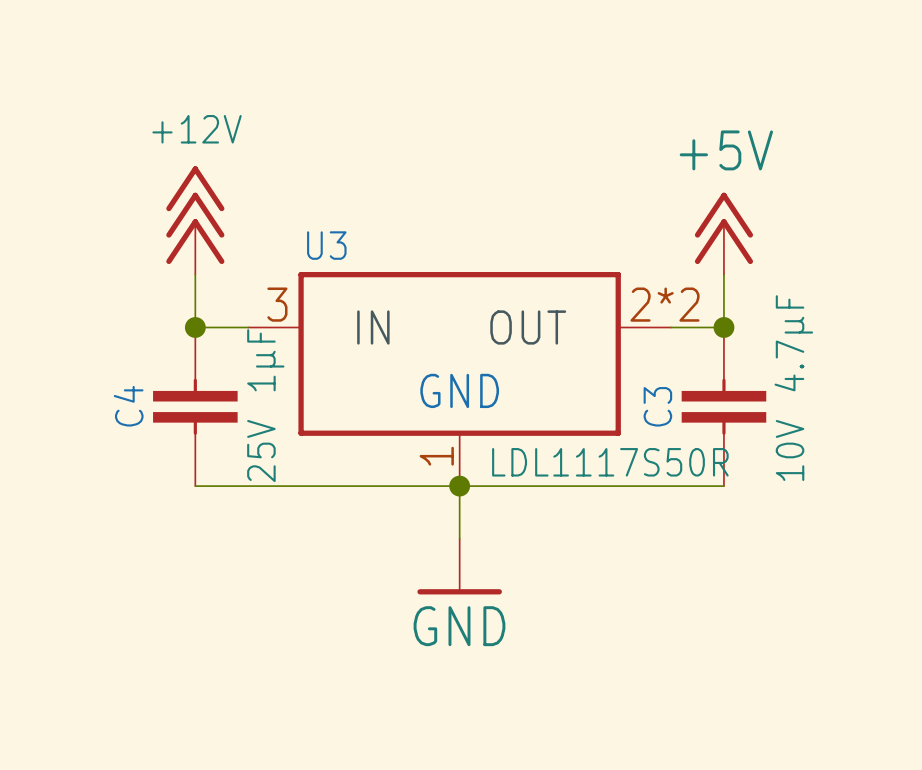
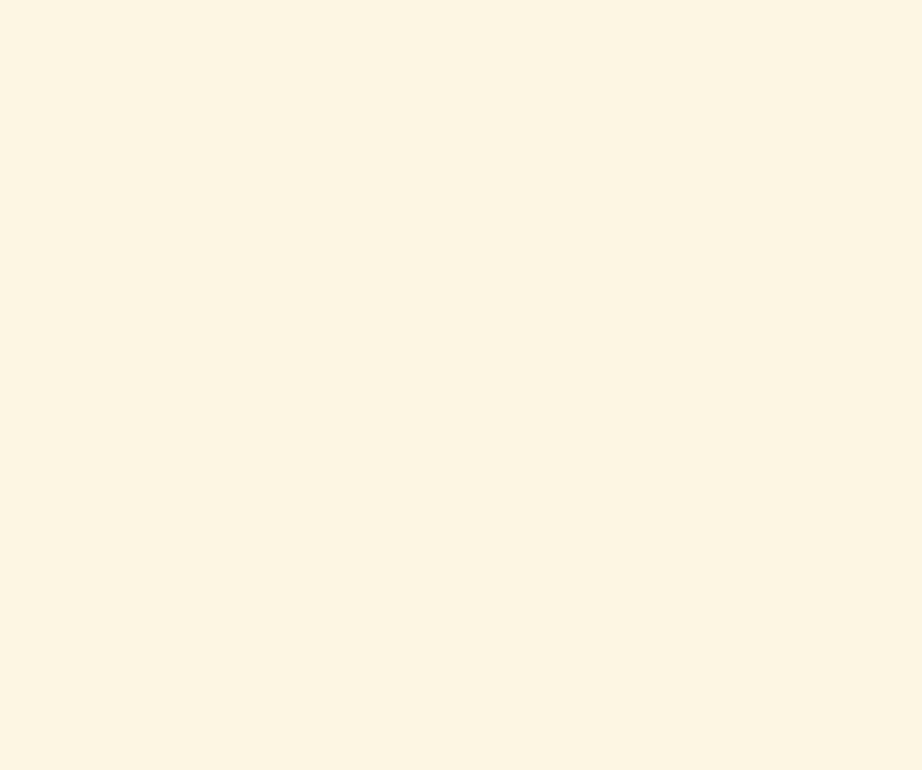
power symbol: +12V (195, 220) -> none
power symbol: +5V (723, 233) -> none
wire: (195, 274) (195, 327) (248, 327) -> none
wire: (723, 274) (723, 327) (671, 327) -> none
junction: (195, 327) -> none
junction: (723, 327) -> none
U3: (459, 379) -> none
C4: (195, 406) -> none
C3: (723, 406) -> none
wire: (195, 486) (723, 486) -> none
wire: (459, 486) (459, 538) -> none
junction: (459, 486) -> none
power symbol: GND (459, 566) -> none

